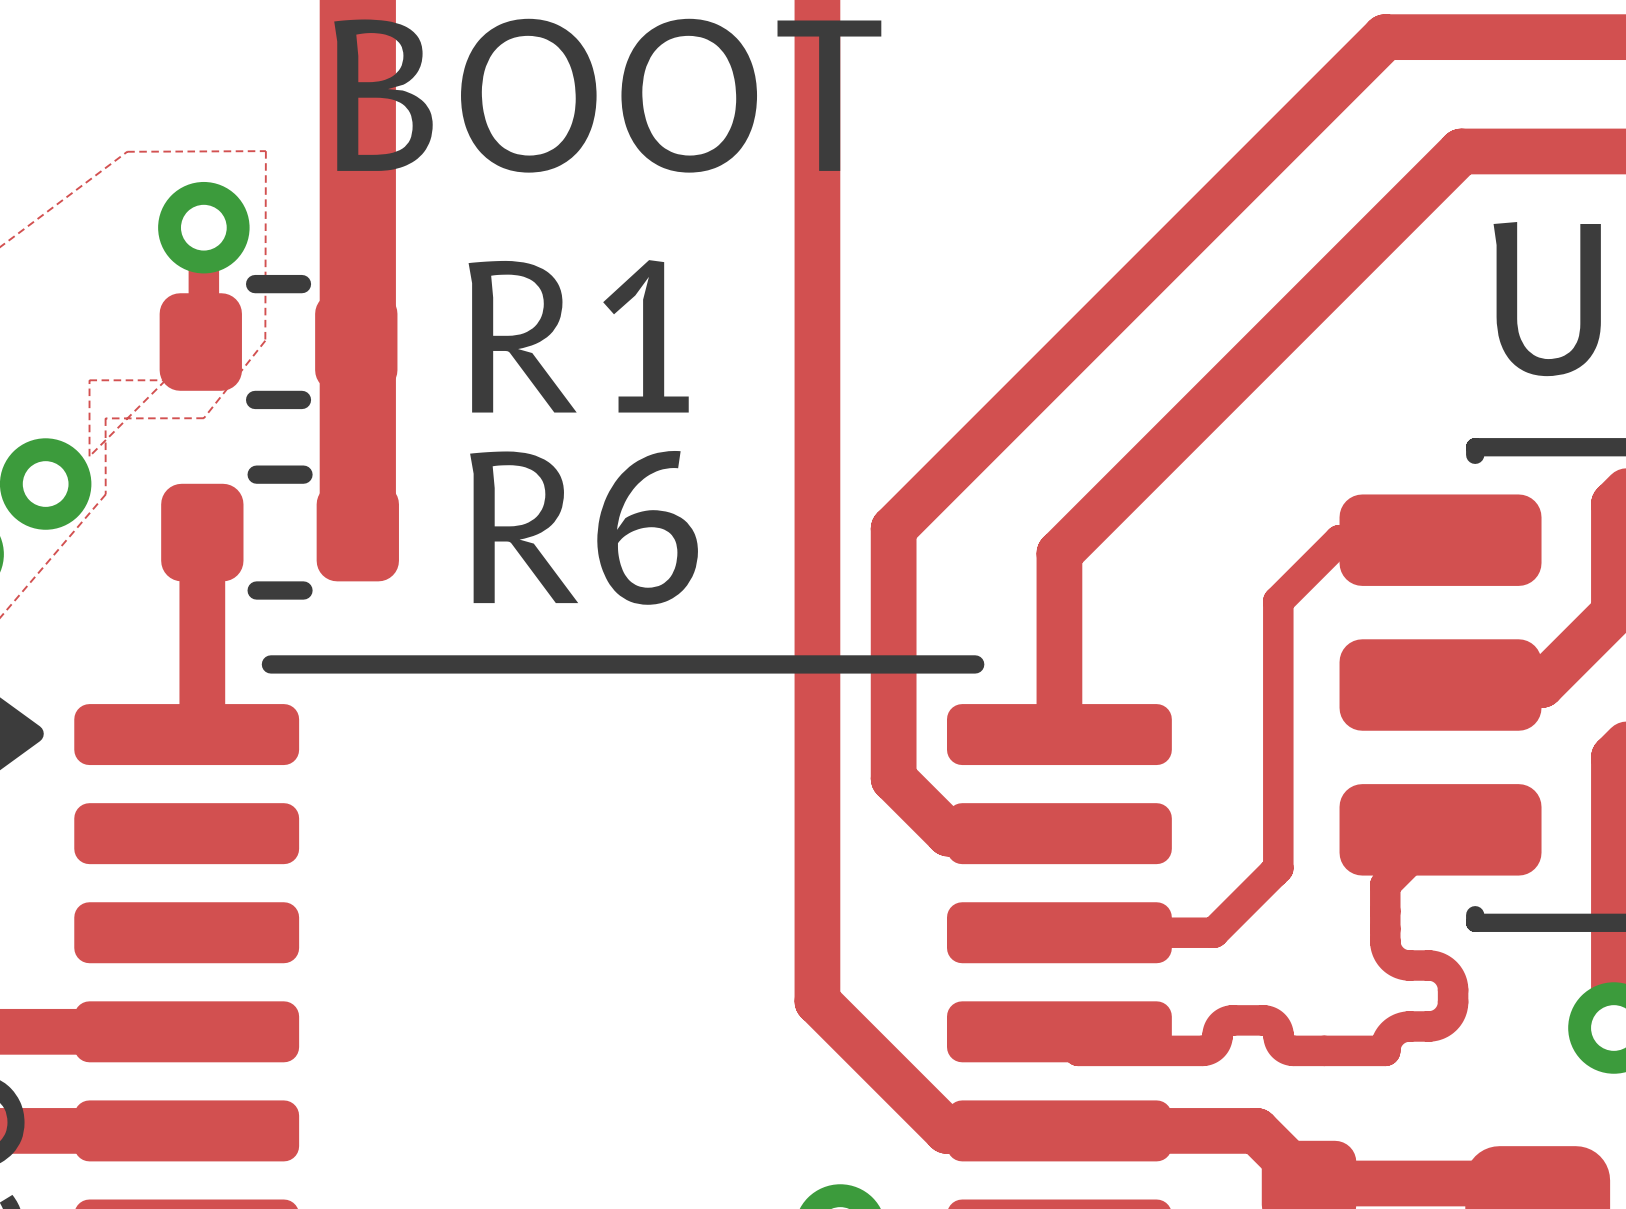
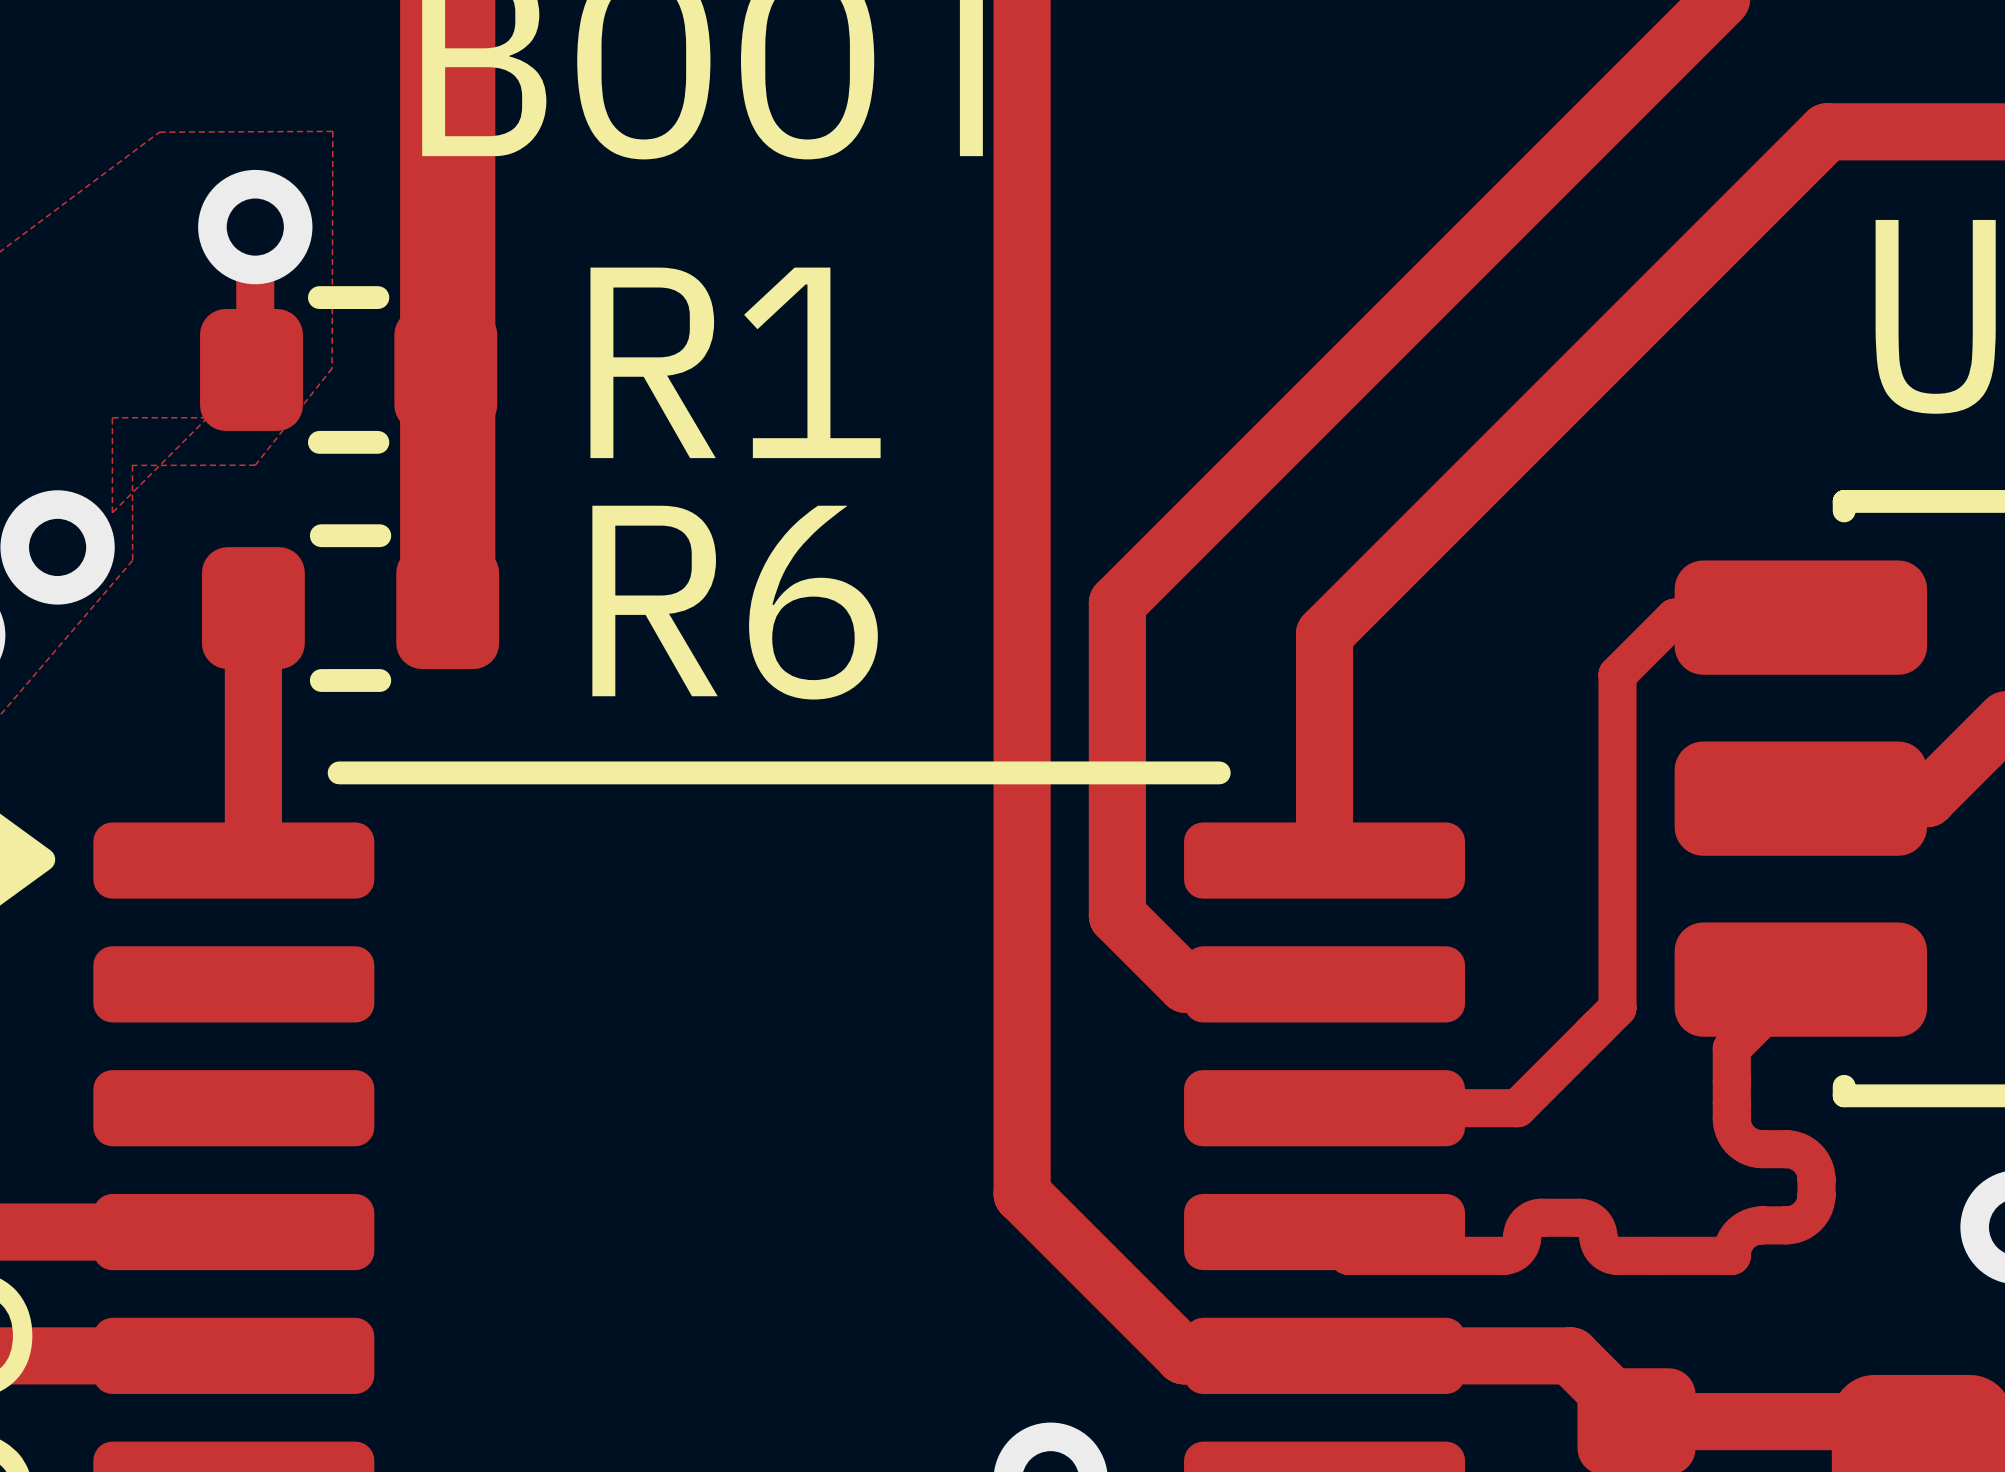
track: (1293, 585) (1278, 601) (1278, 868) -> (1617, 674) (1617, 1008) (1598, 1027)

